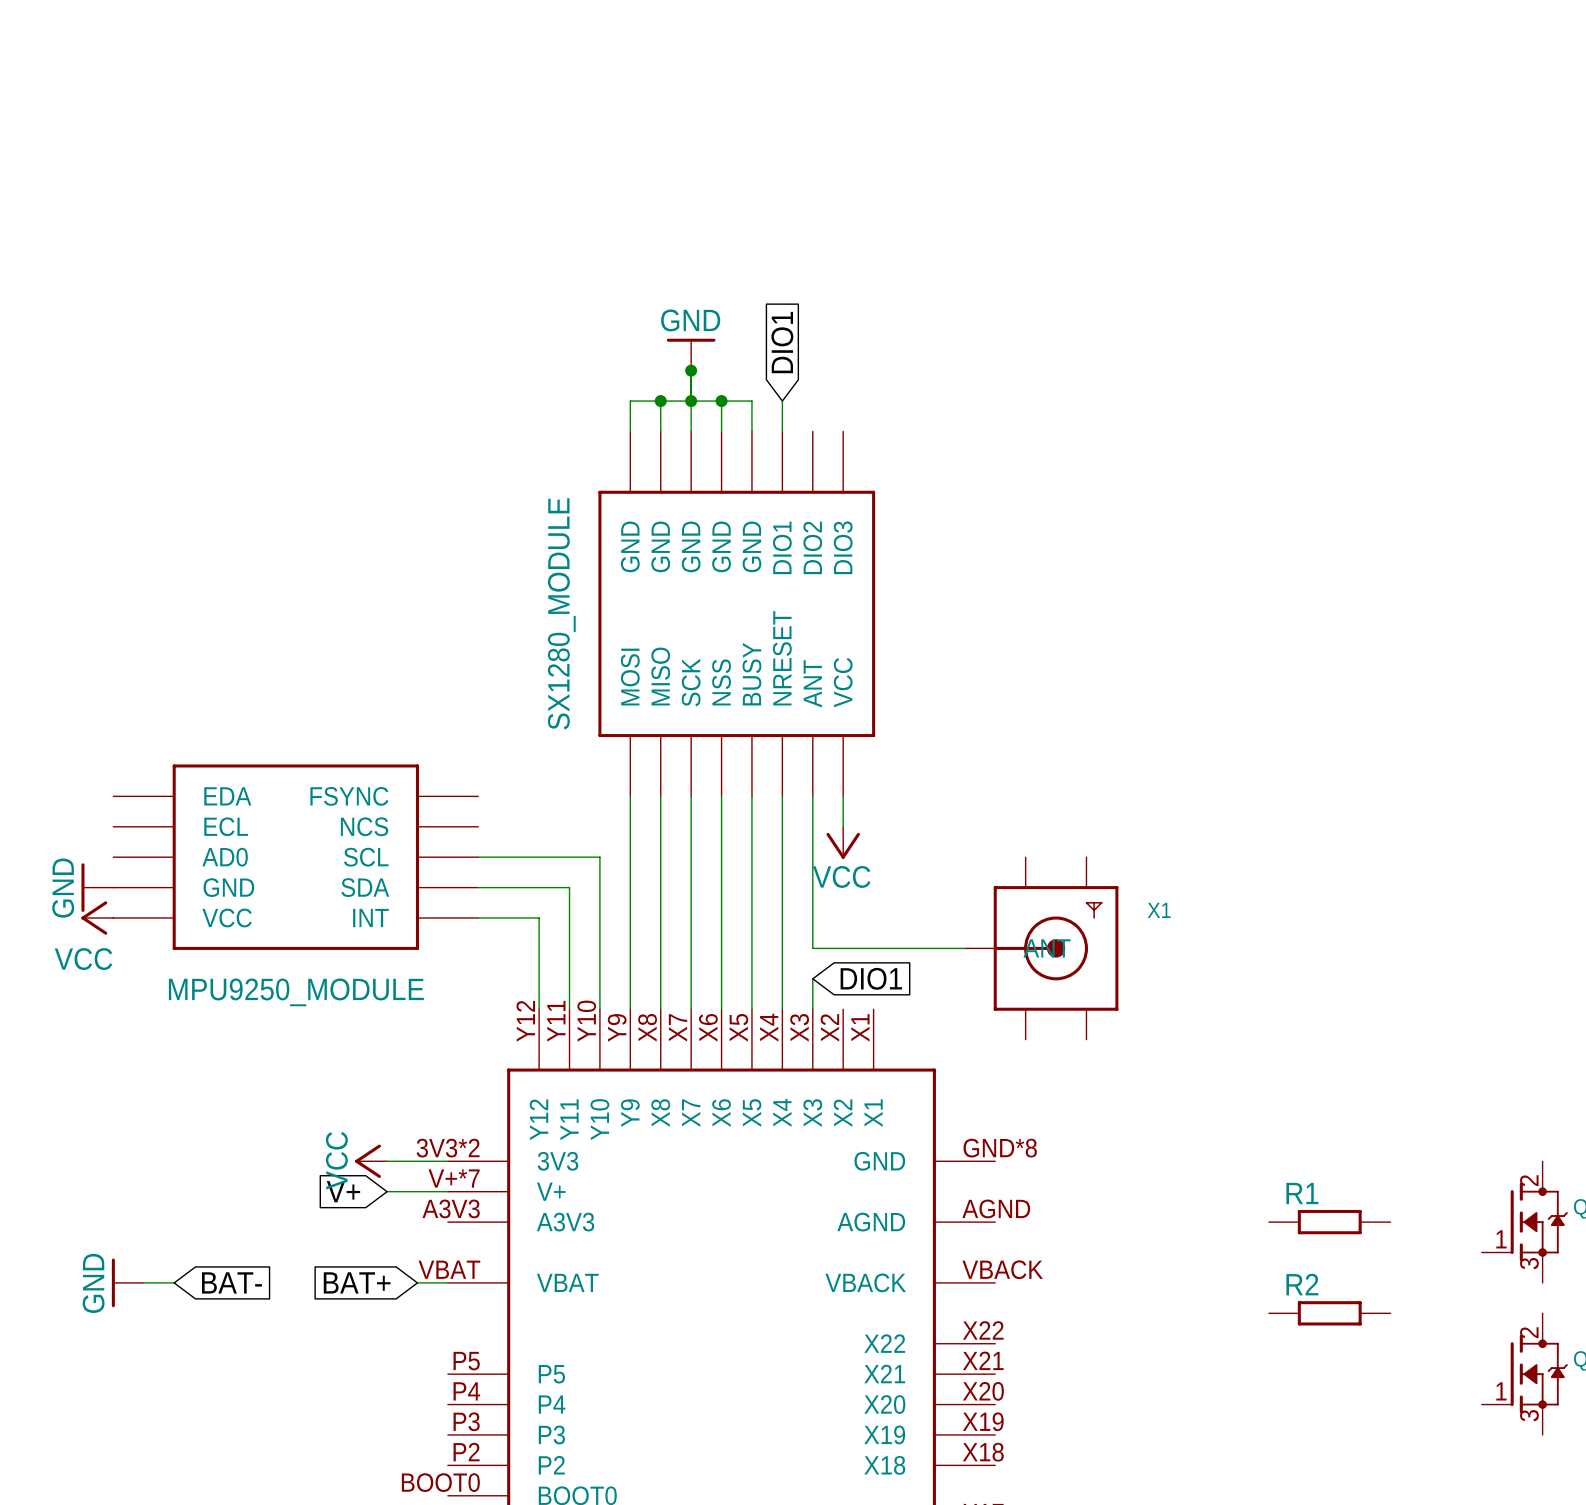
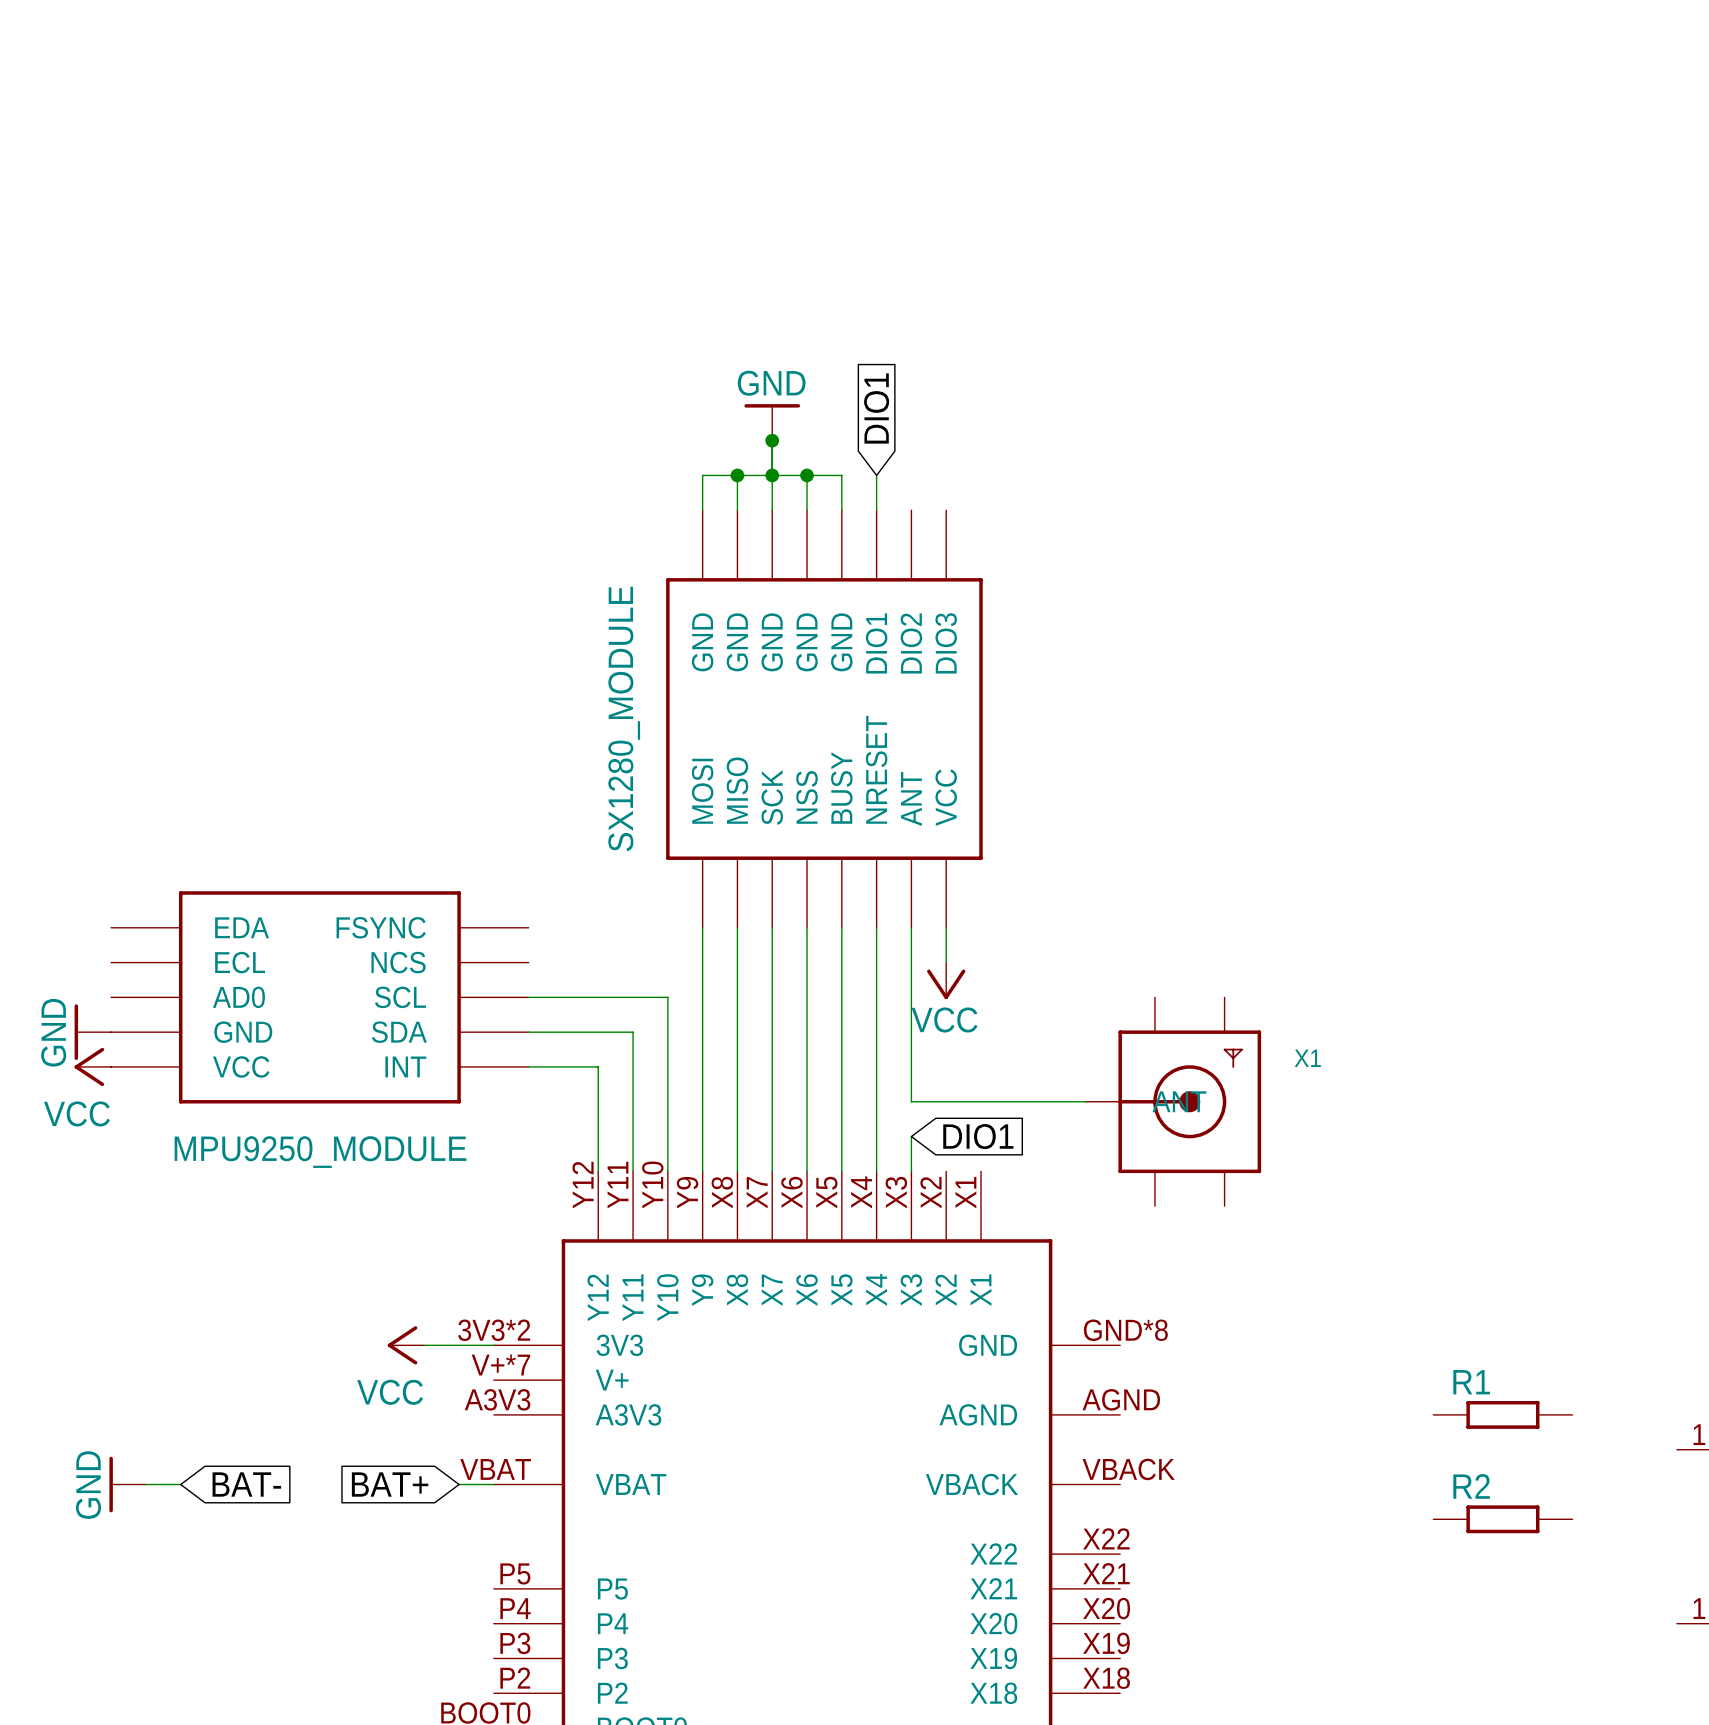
power symbol text rotation: 0° (336, 1160) -> 90° clockwise (390, 1392)
global label: V+ (343, 1191) -> none
wire: (387, 1191) (447, 1191) -> none

